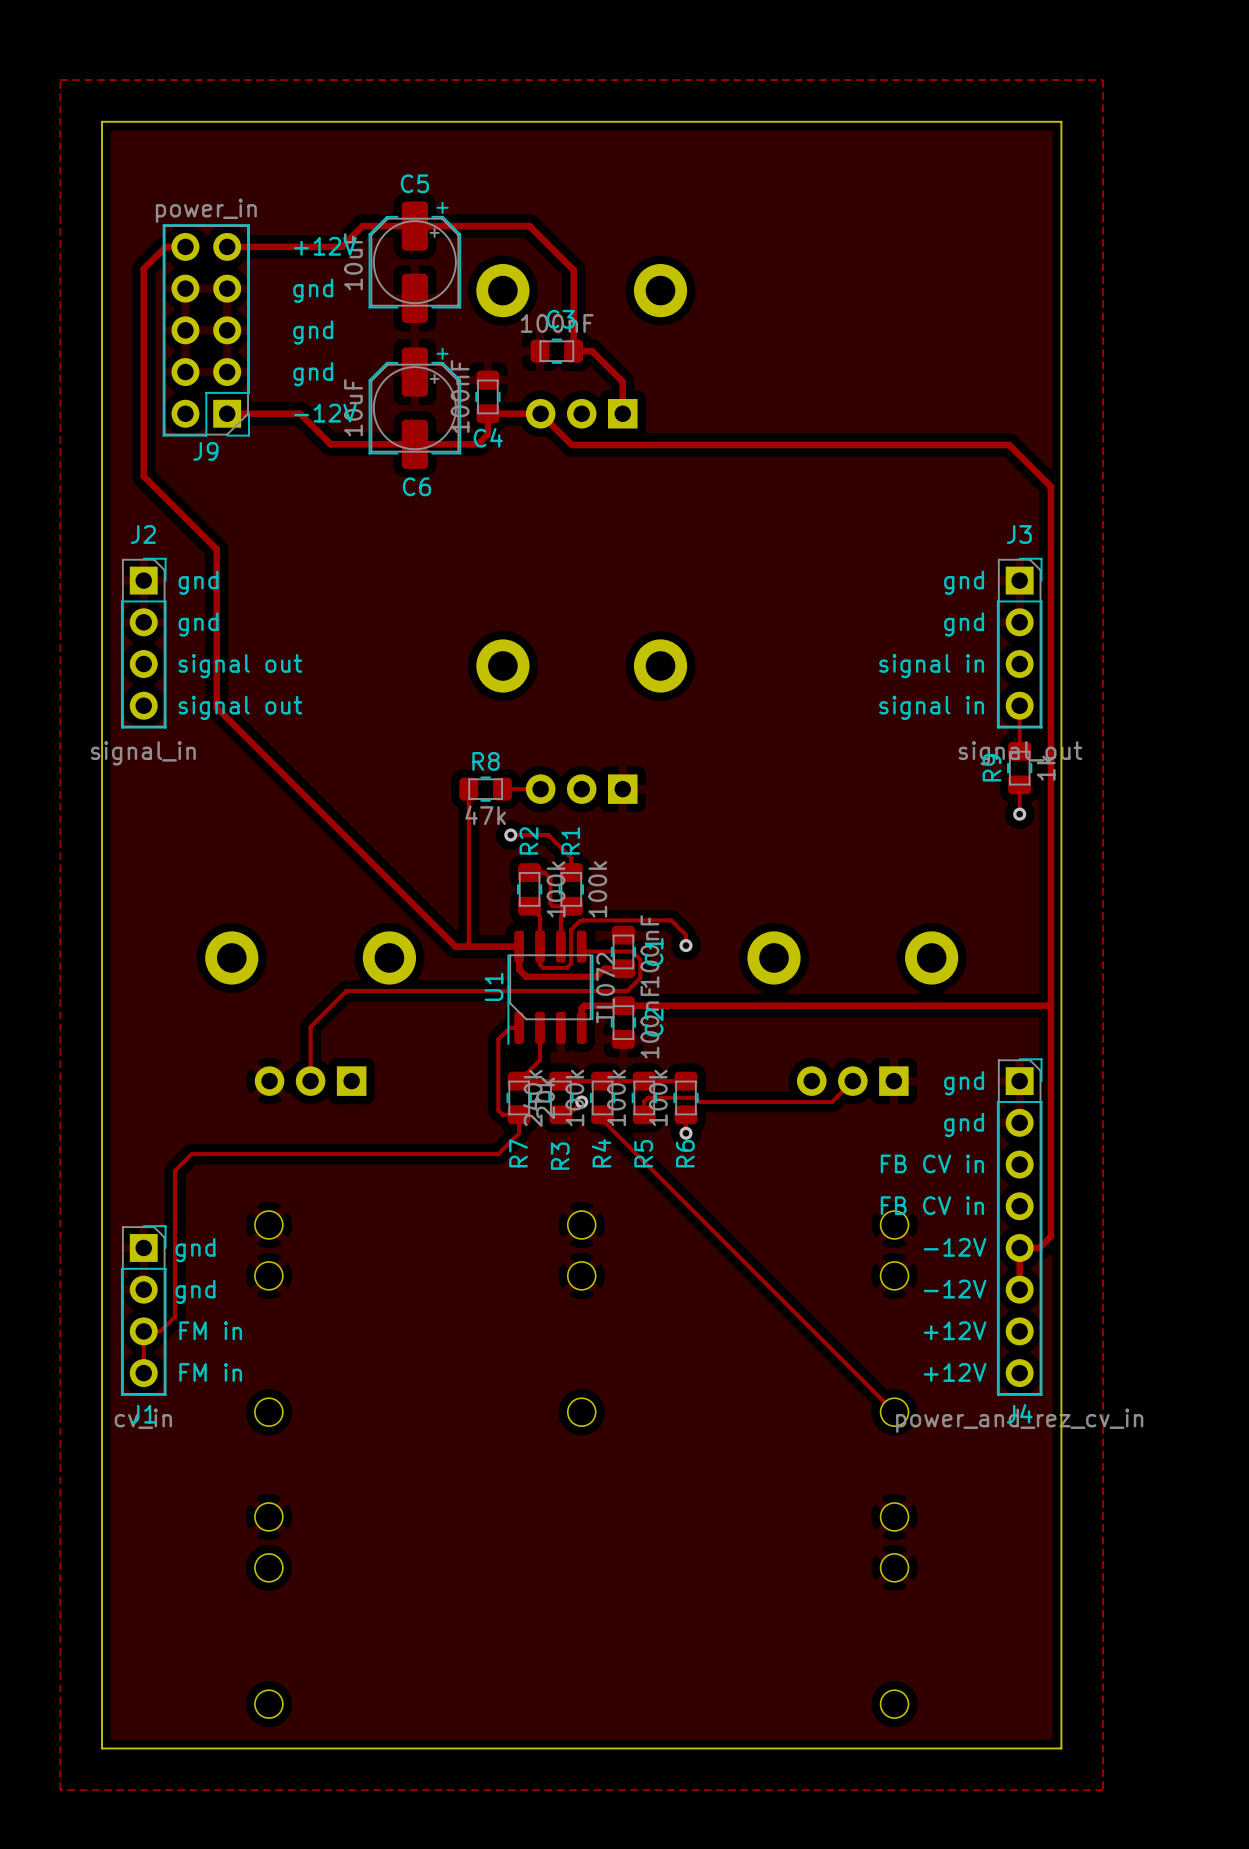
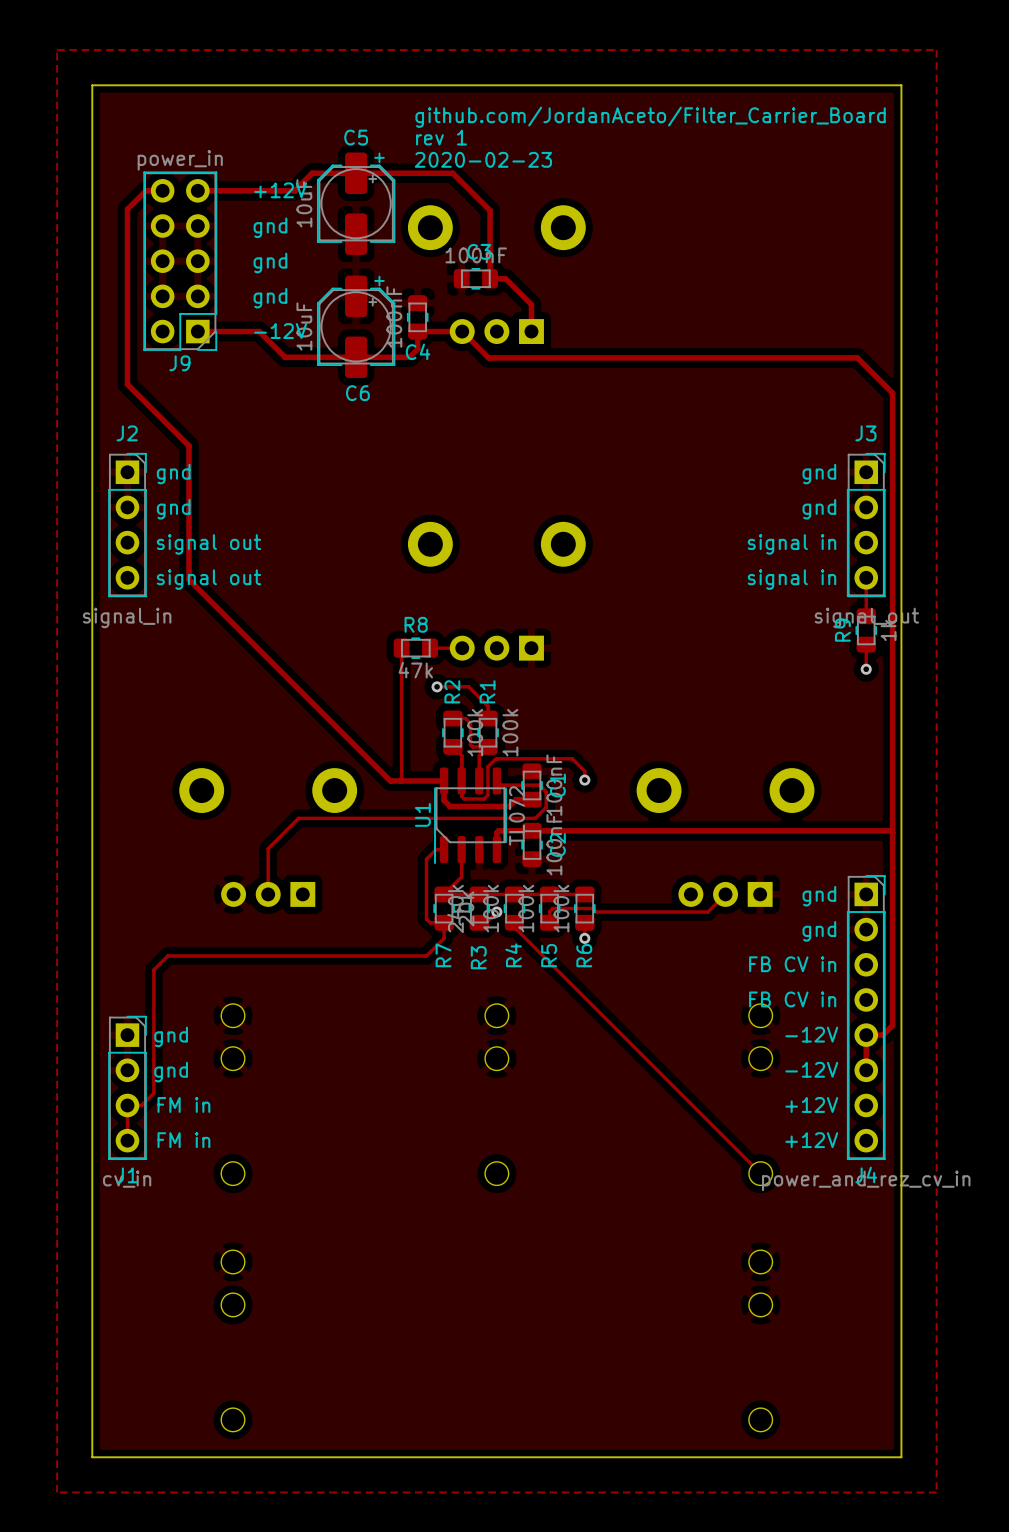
text: none -> github.com/JordanAceto/Filter_Carrier_Board (650, 117)
text: none -> rev 1 (441, 137)
text: none -> 2020-02-23 (483, 159)

